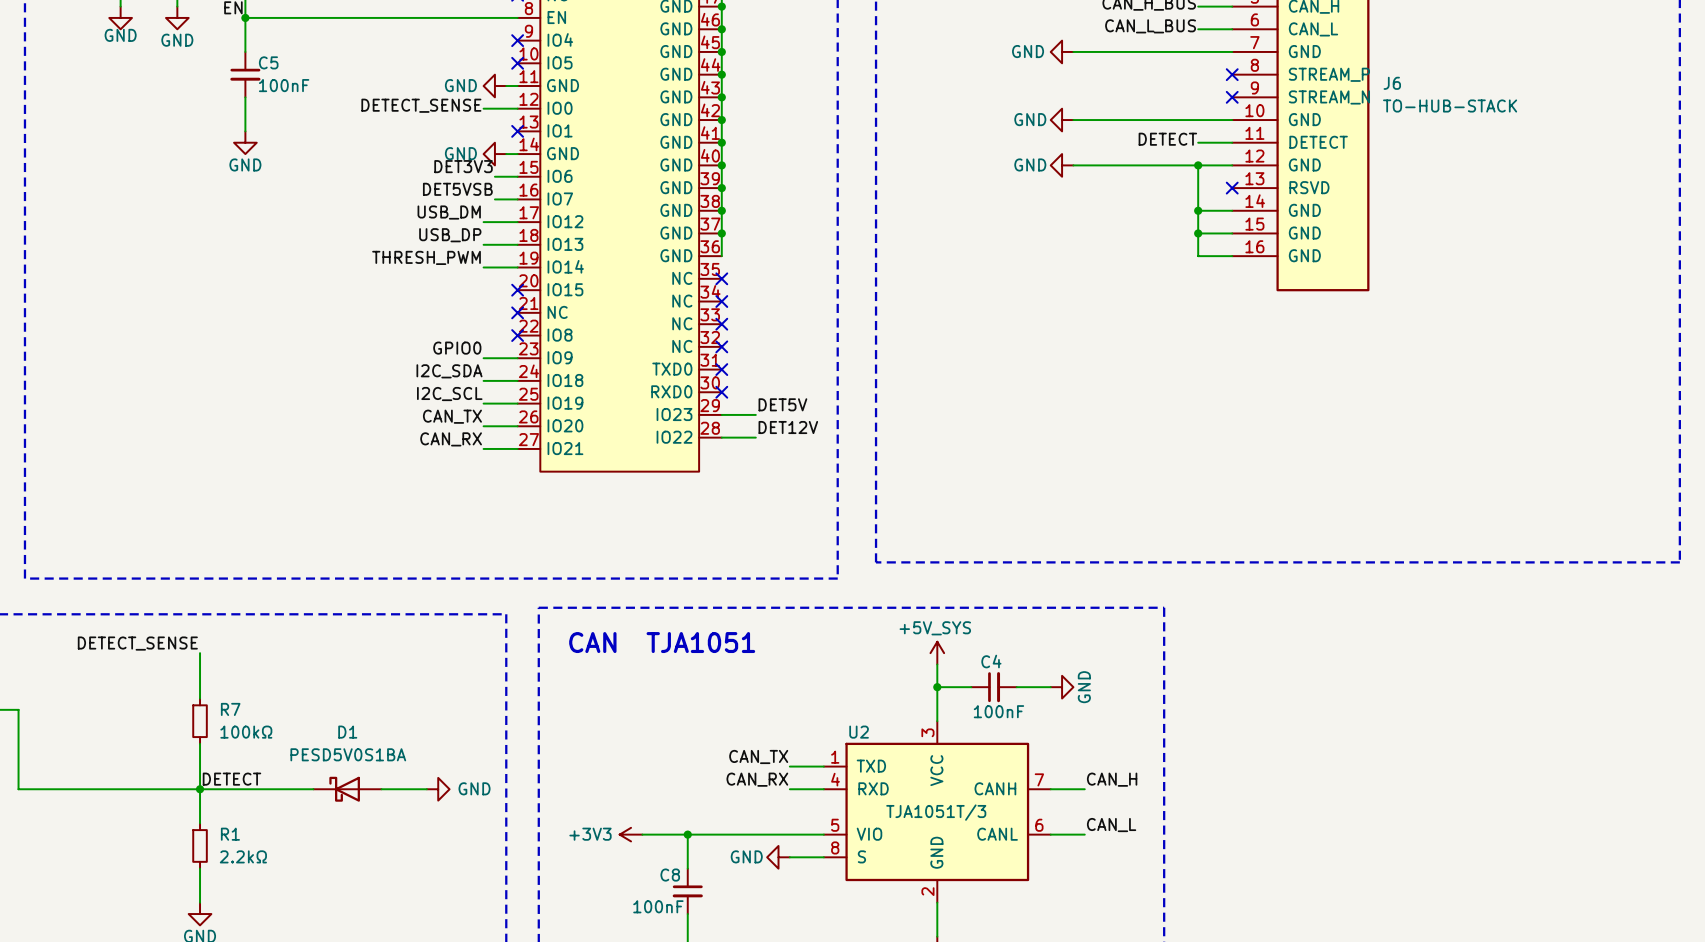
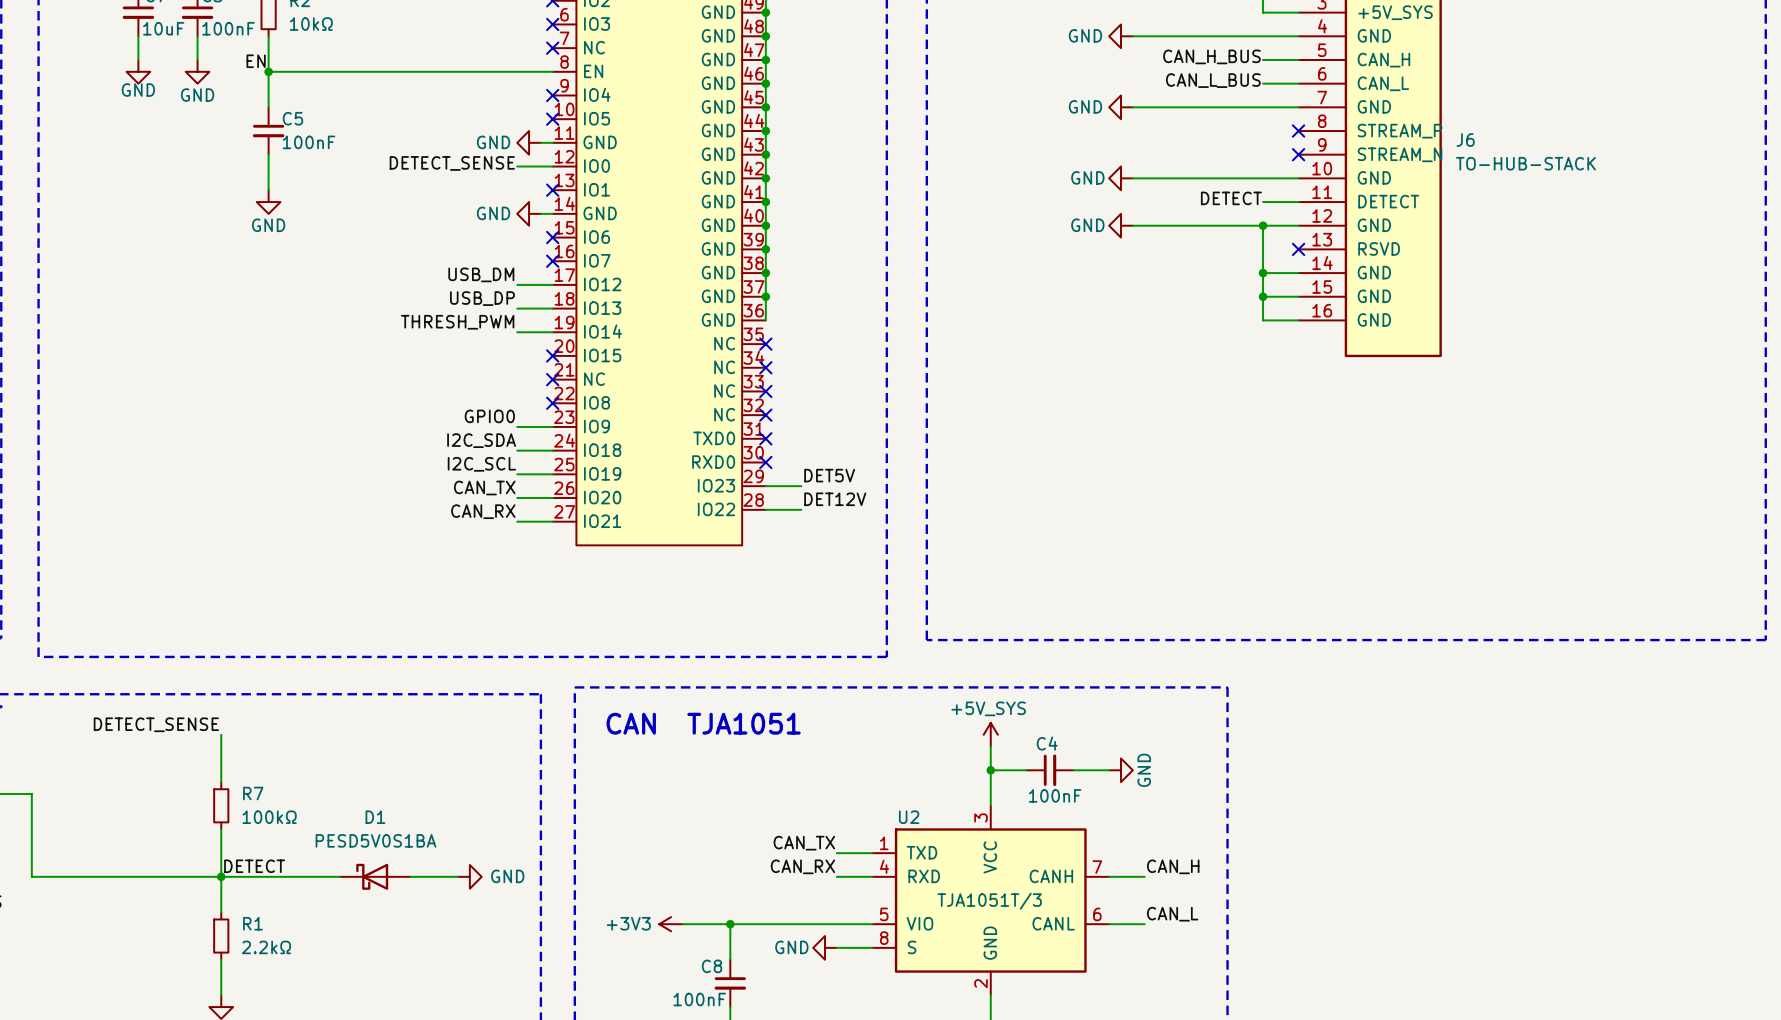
label: DET3V3 (463, 166) -> none
wire: (494, 176) (517, 176) -> none
no-connect mark: none -> (552, 237)
label: DET5VSB (457, 189) -> none
wire: (494, 199) (517, 199) -> none
no-connect mark: none -> (552, 261)

